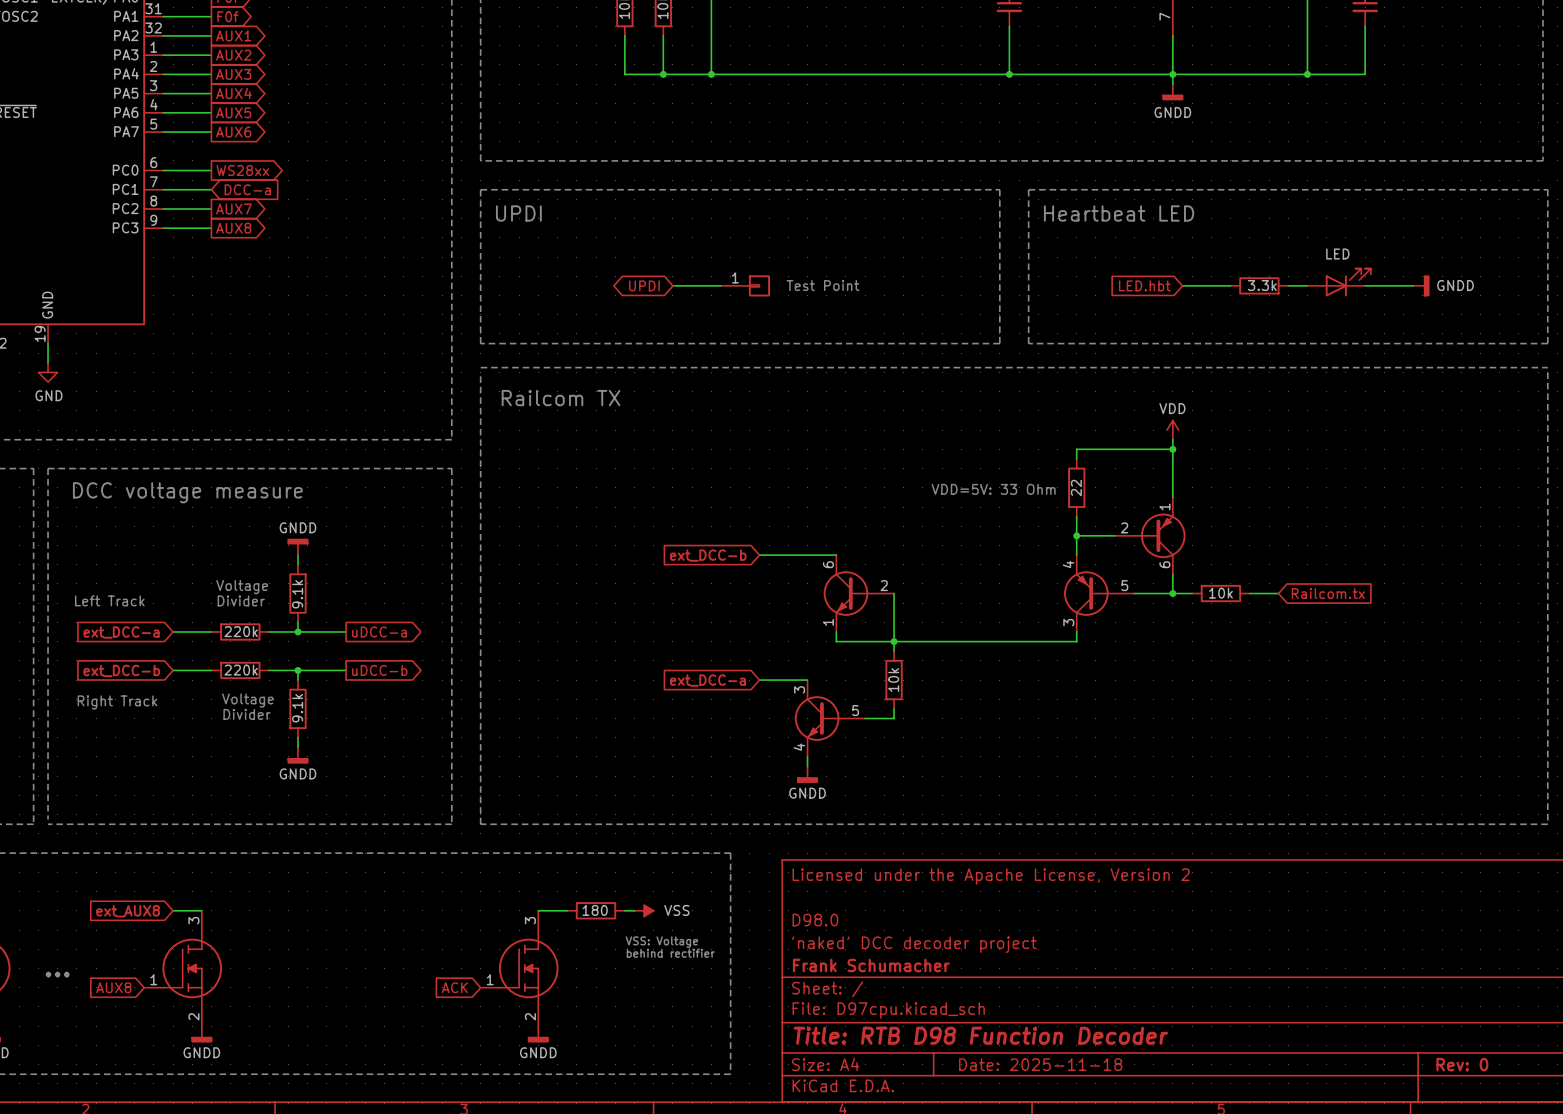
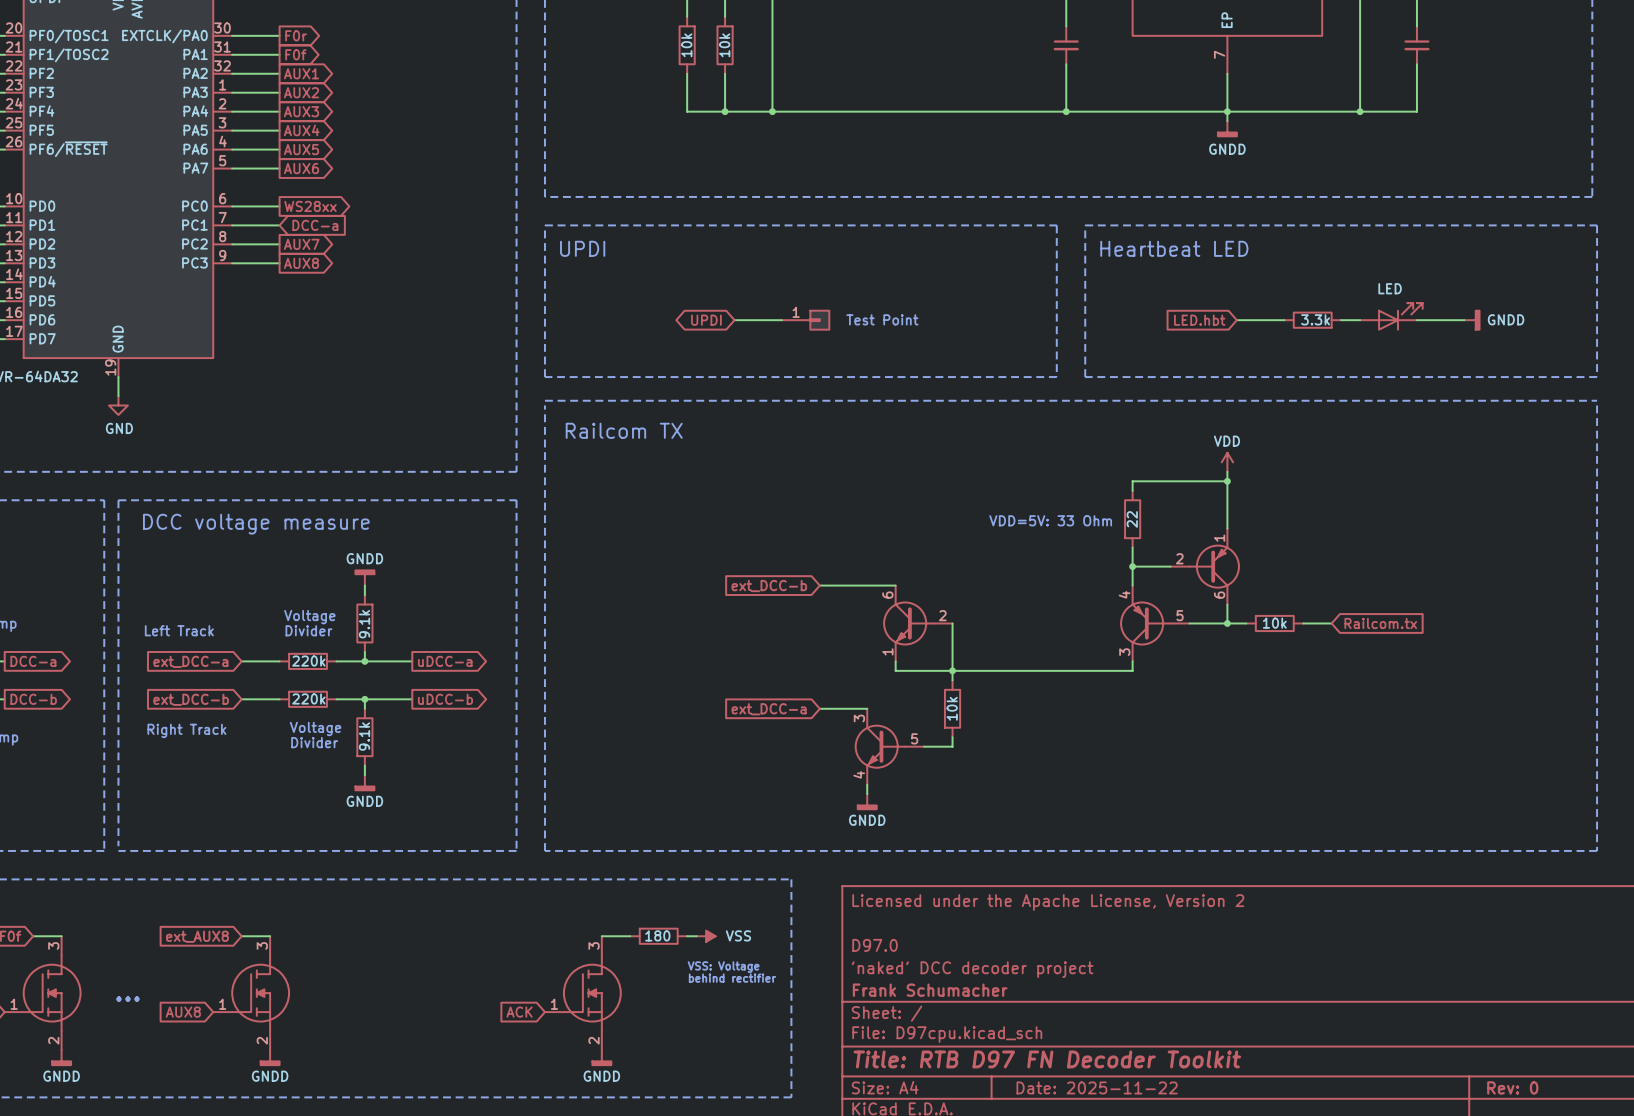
title block: D98.0 (815, 920) -> D97.0 (875, 945)
title block: Title: RTB D98 Function Decoder (980, 1035) -> Title: RTB D97 FN Decoder Toolkit (1047, 1059)
title block: Date: 2025-11-18 (1040, 1064) -> Date: 2025-11-22 (1097, 1087)

